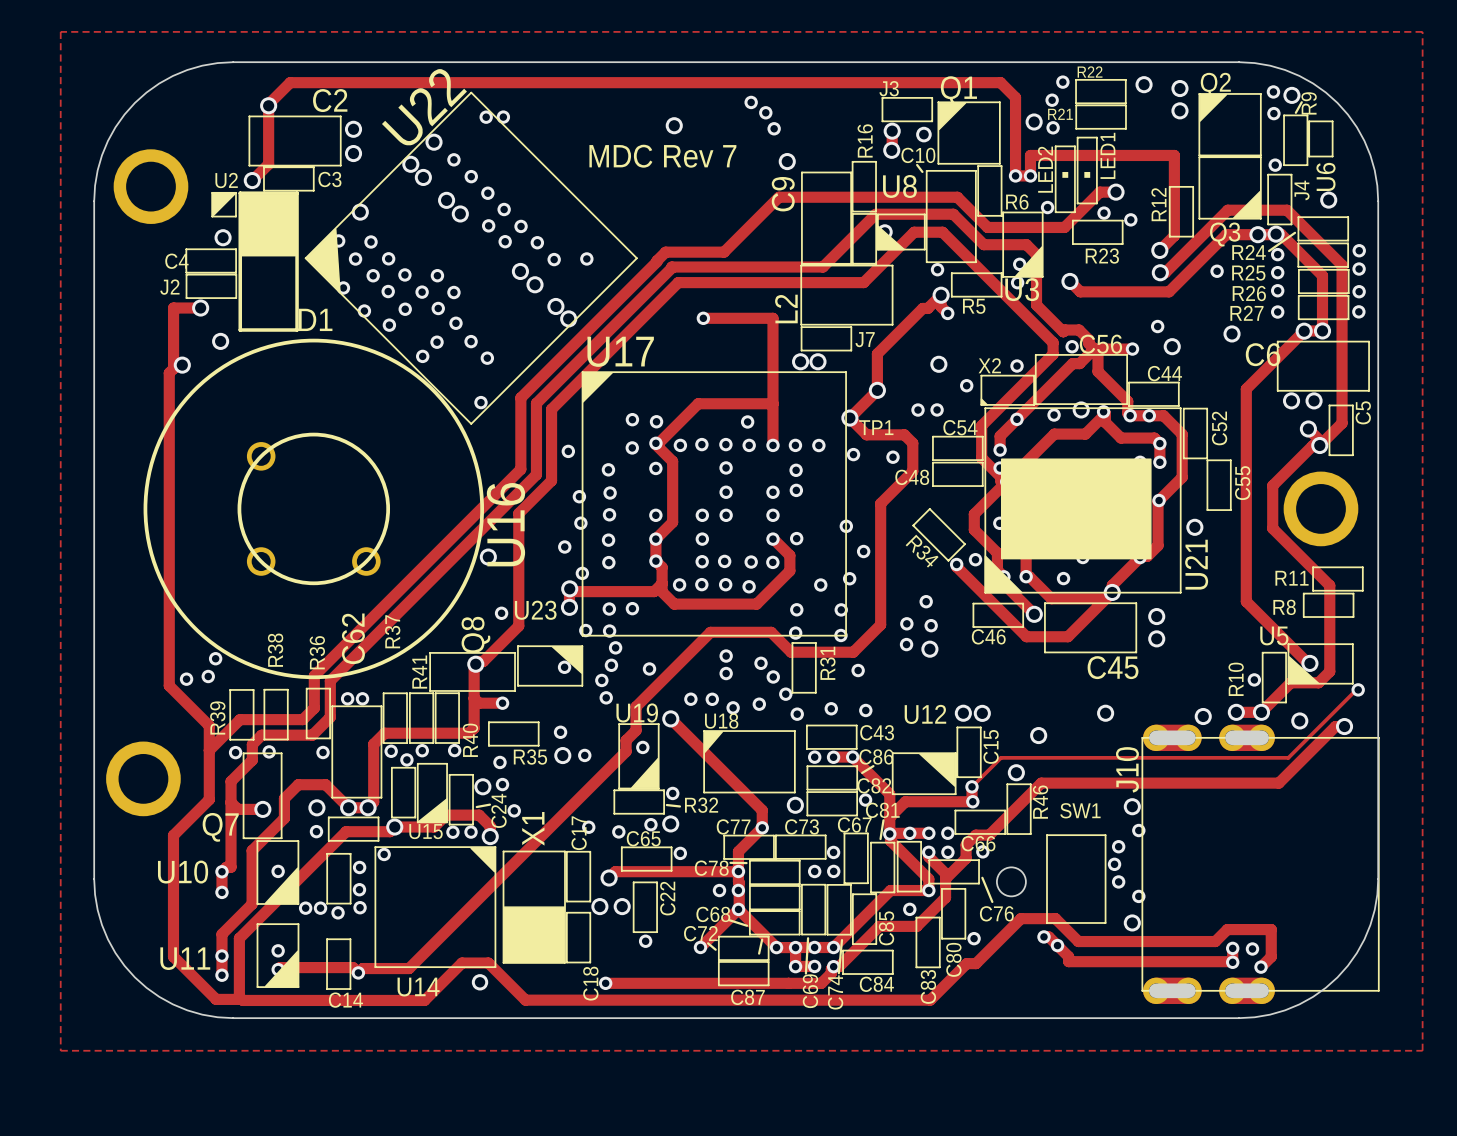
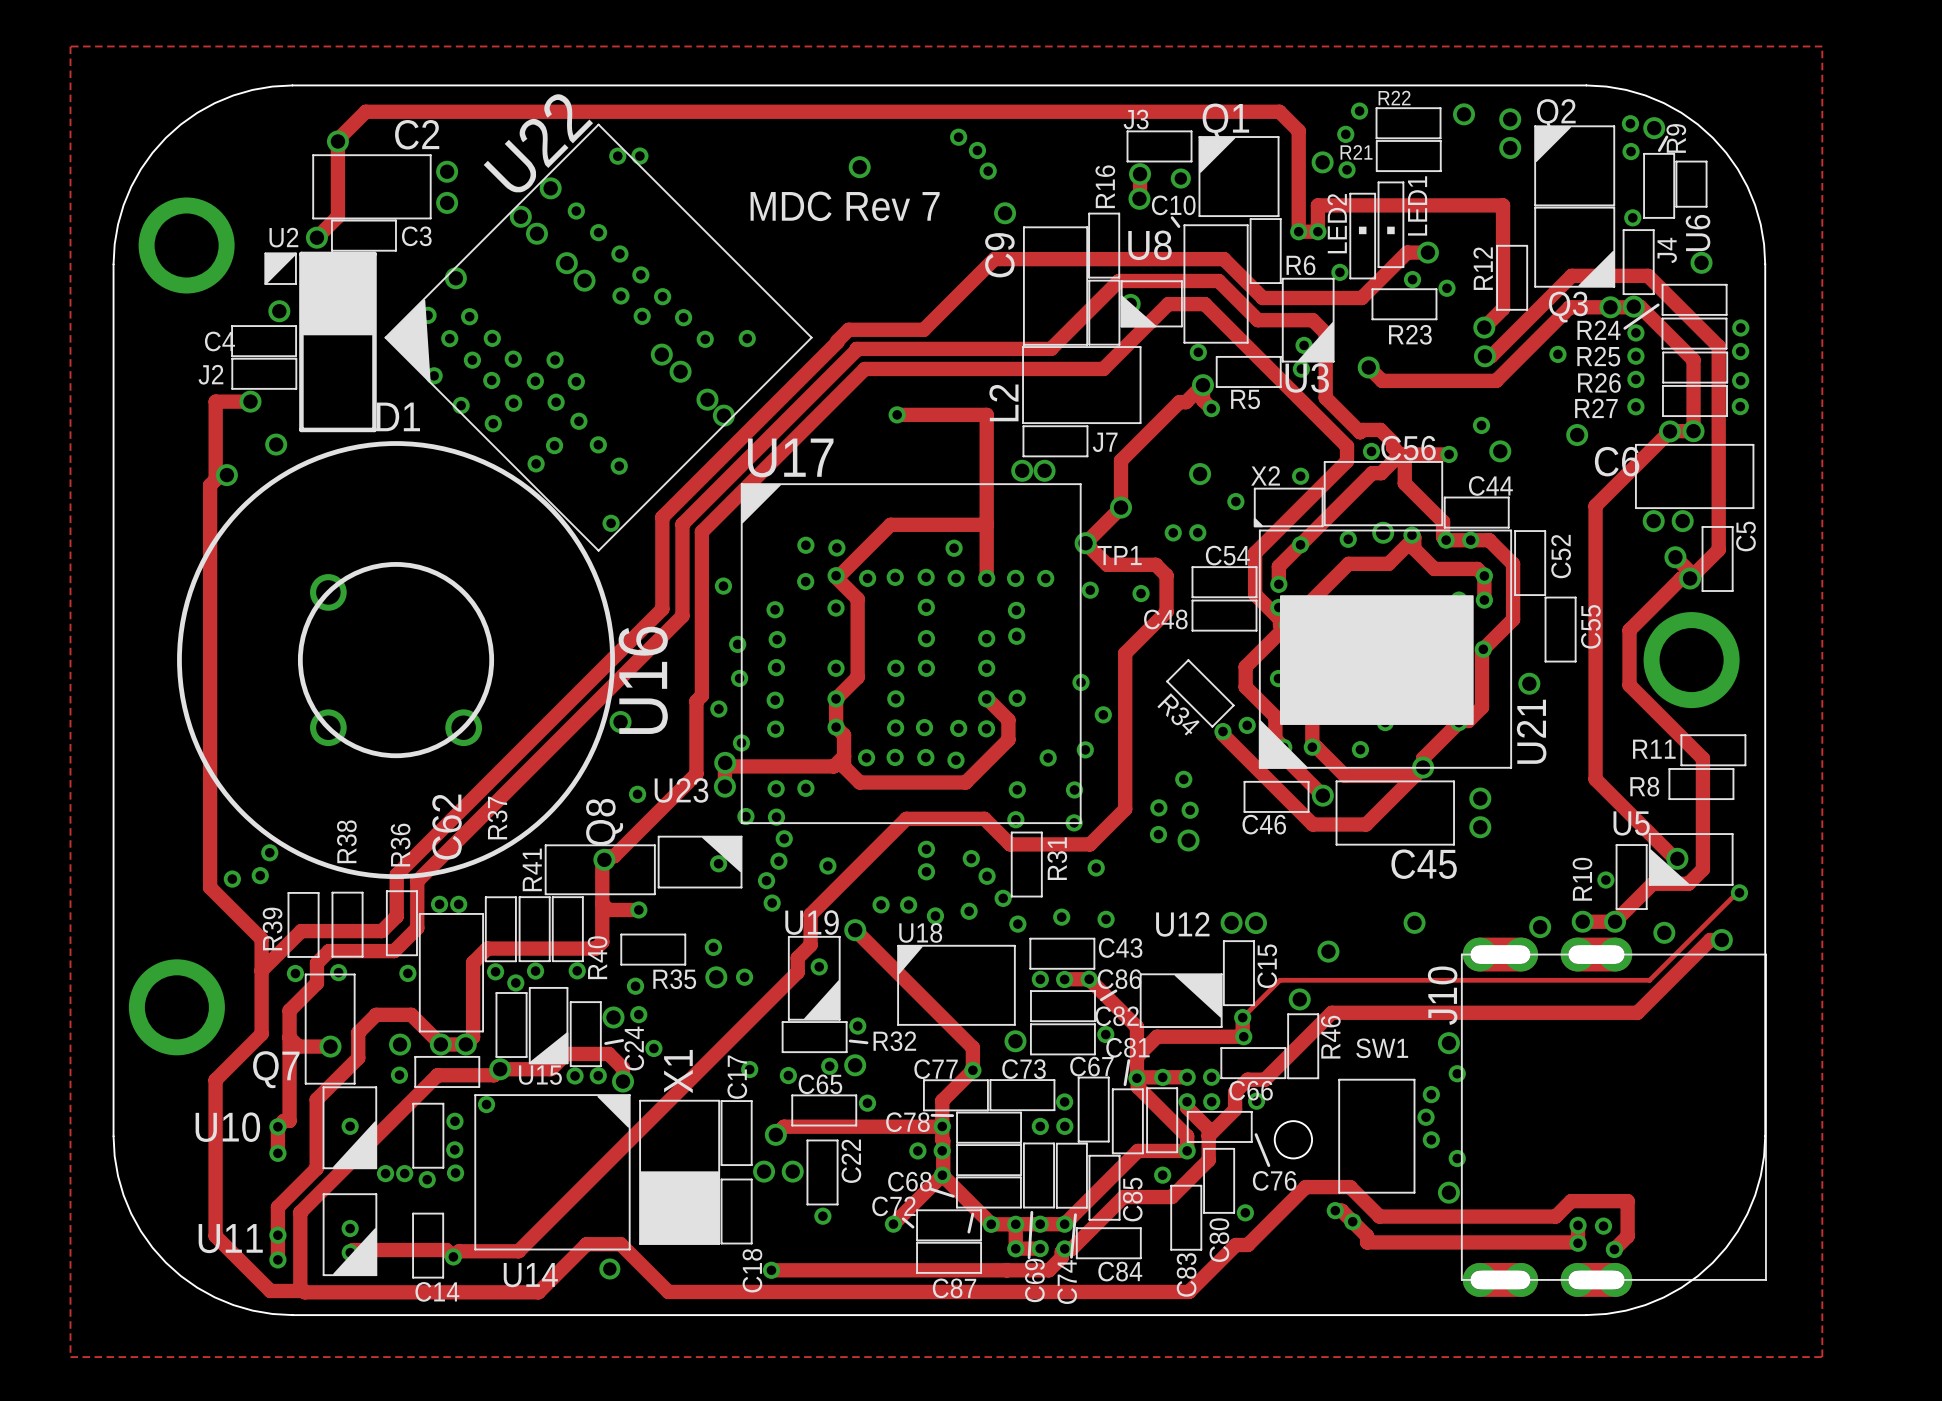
track: (551, 480) (518, 513) (518, 626) -> (701, 623) (701, 695) (696, 701) (696, 773) (659, 810)

